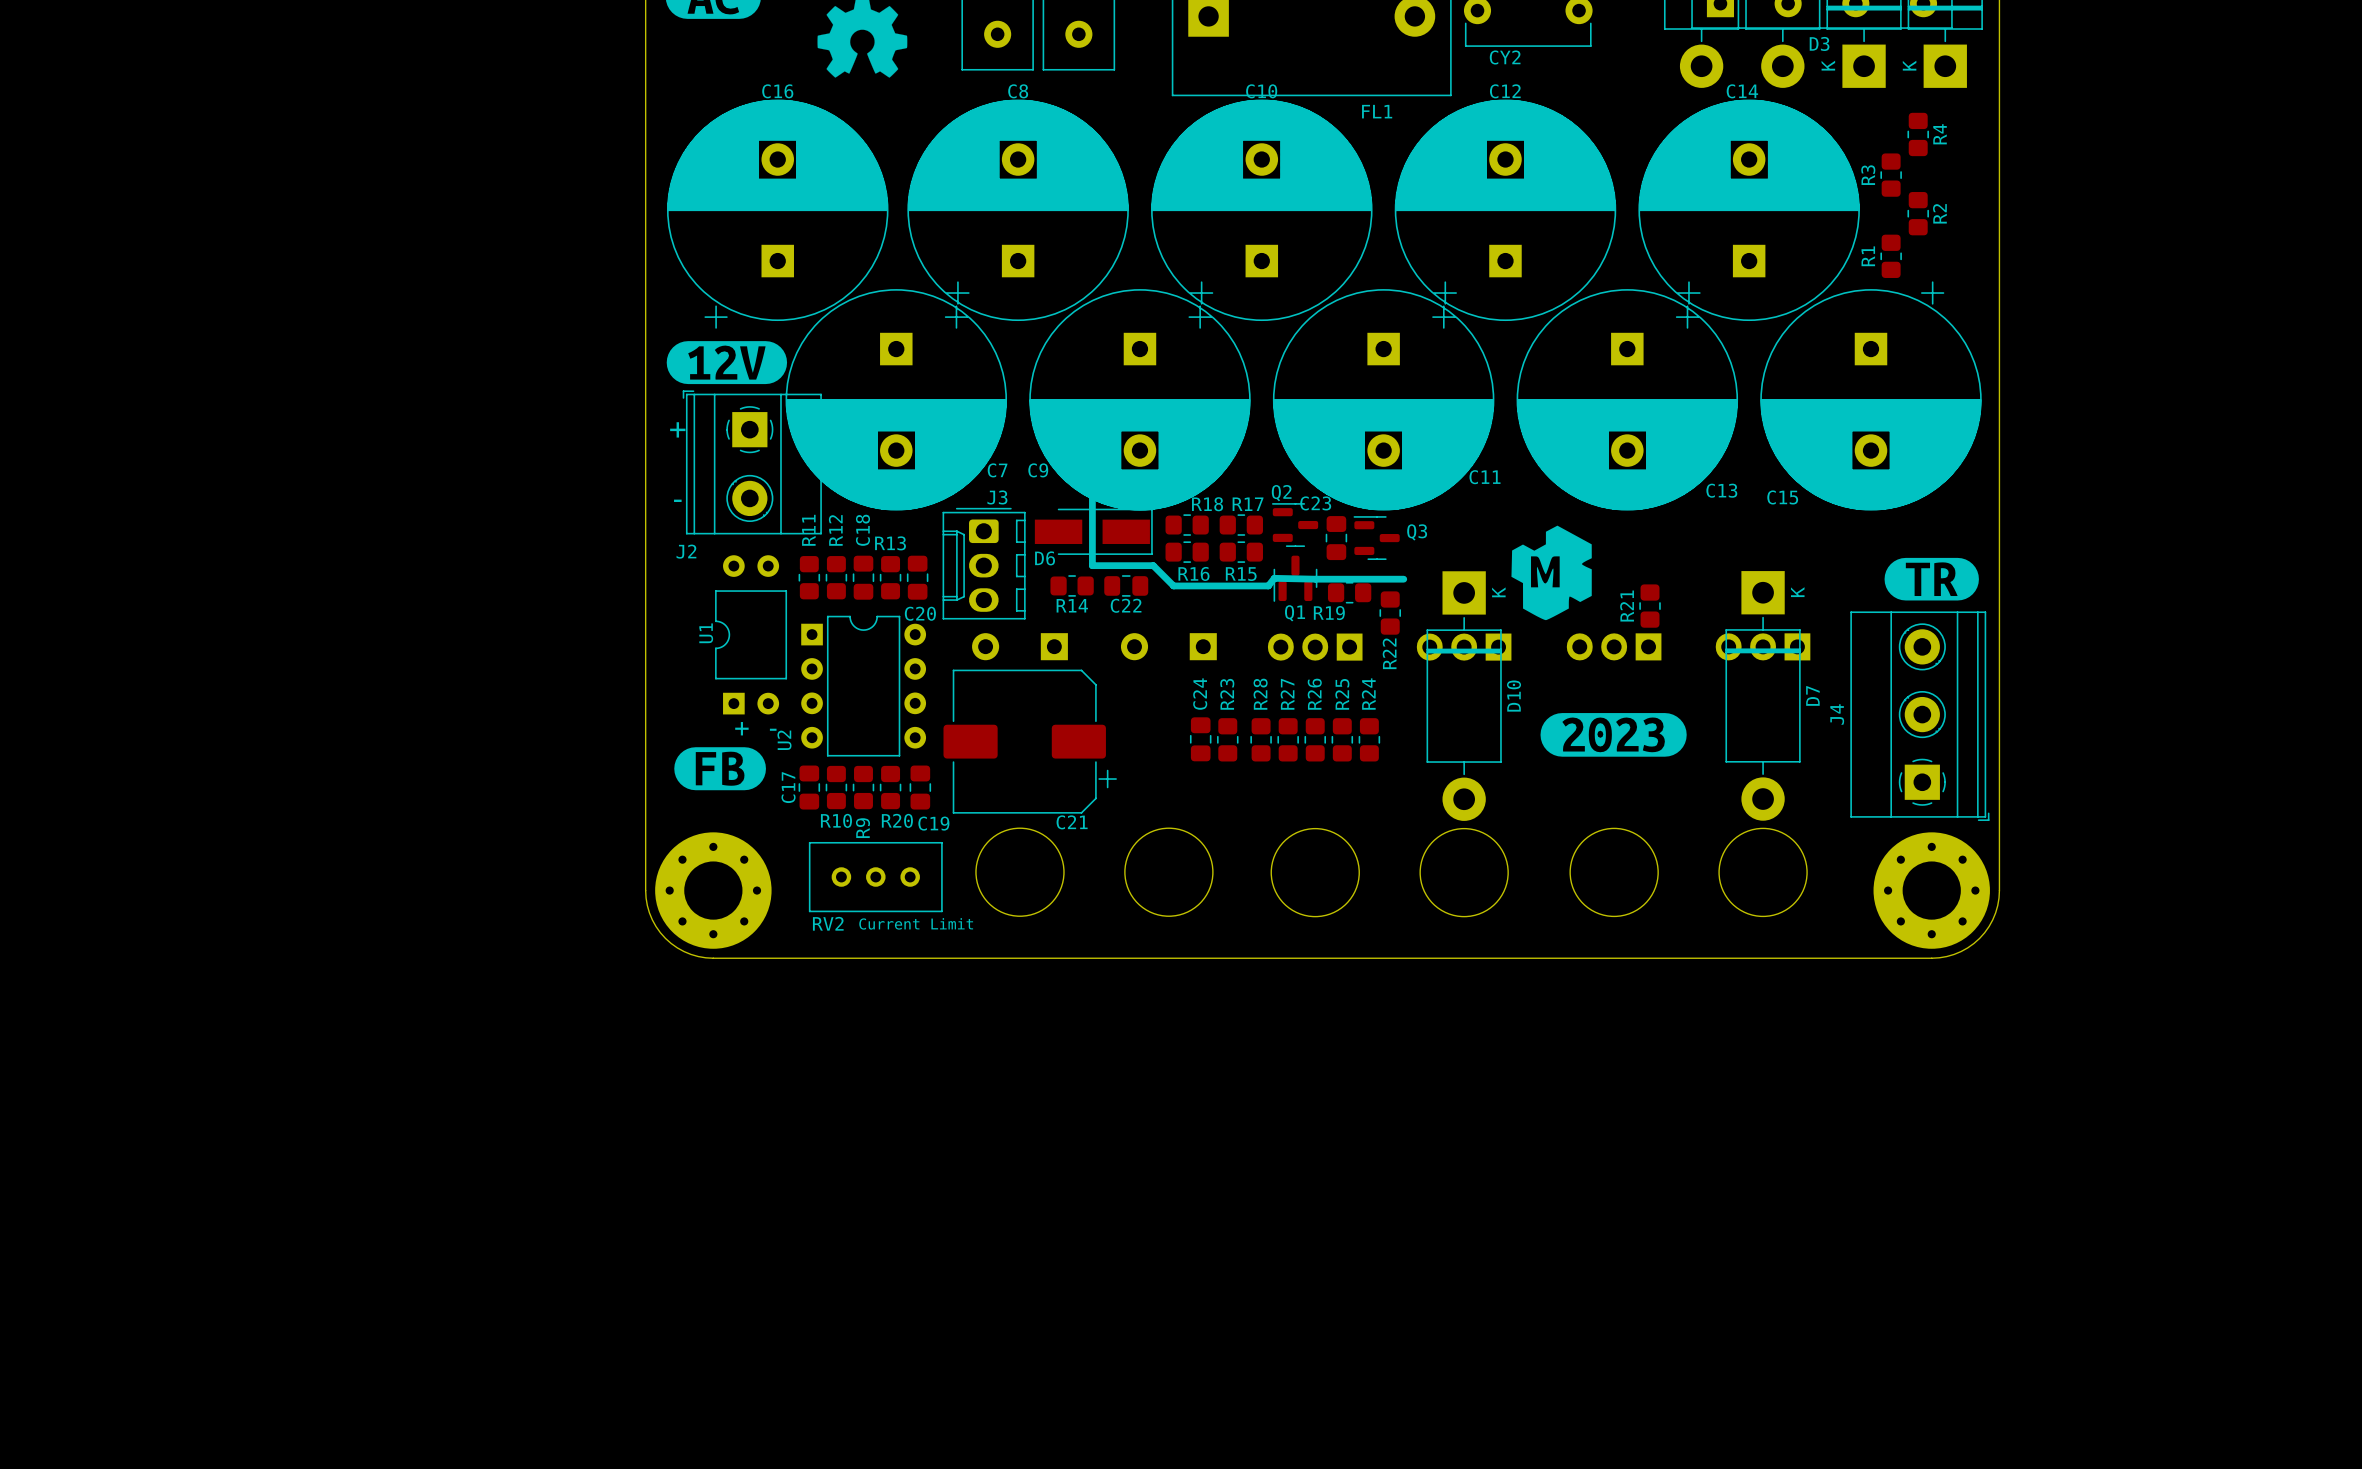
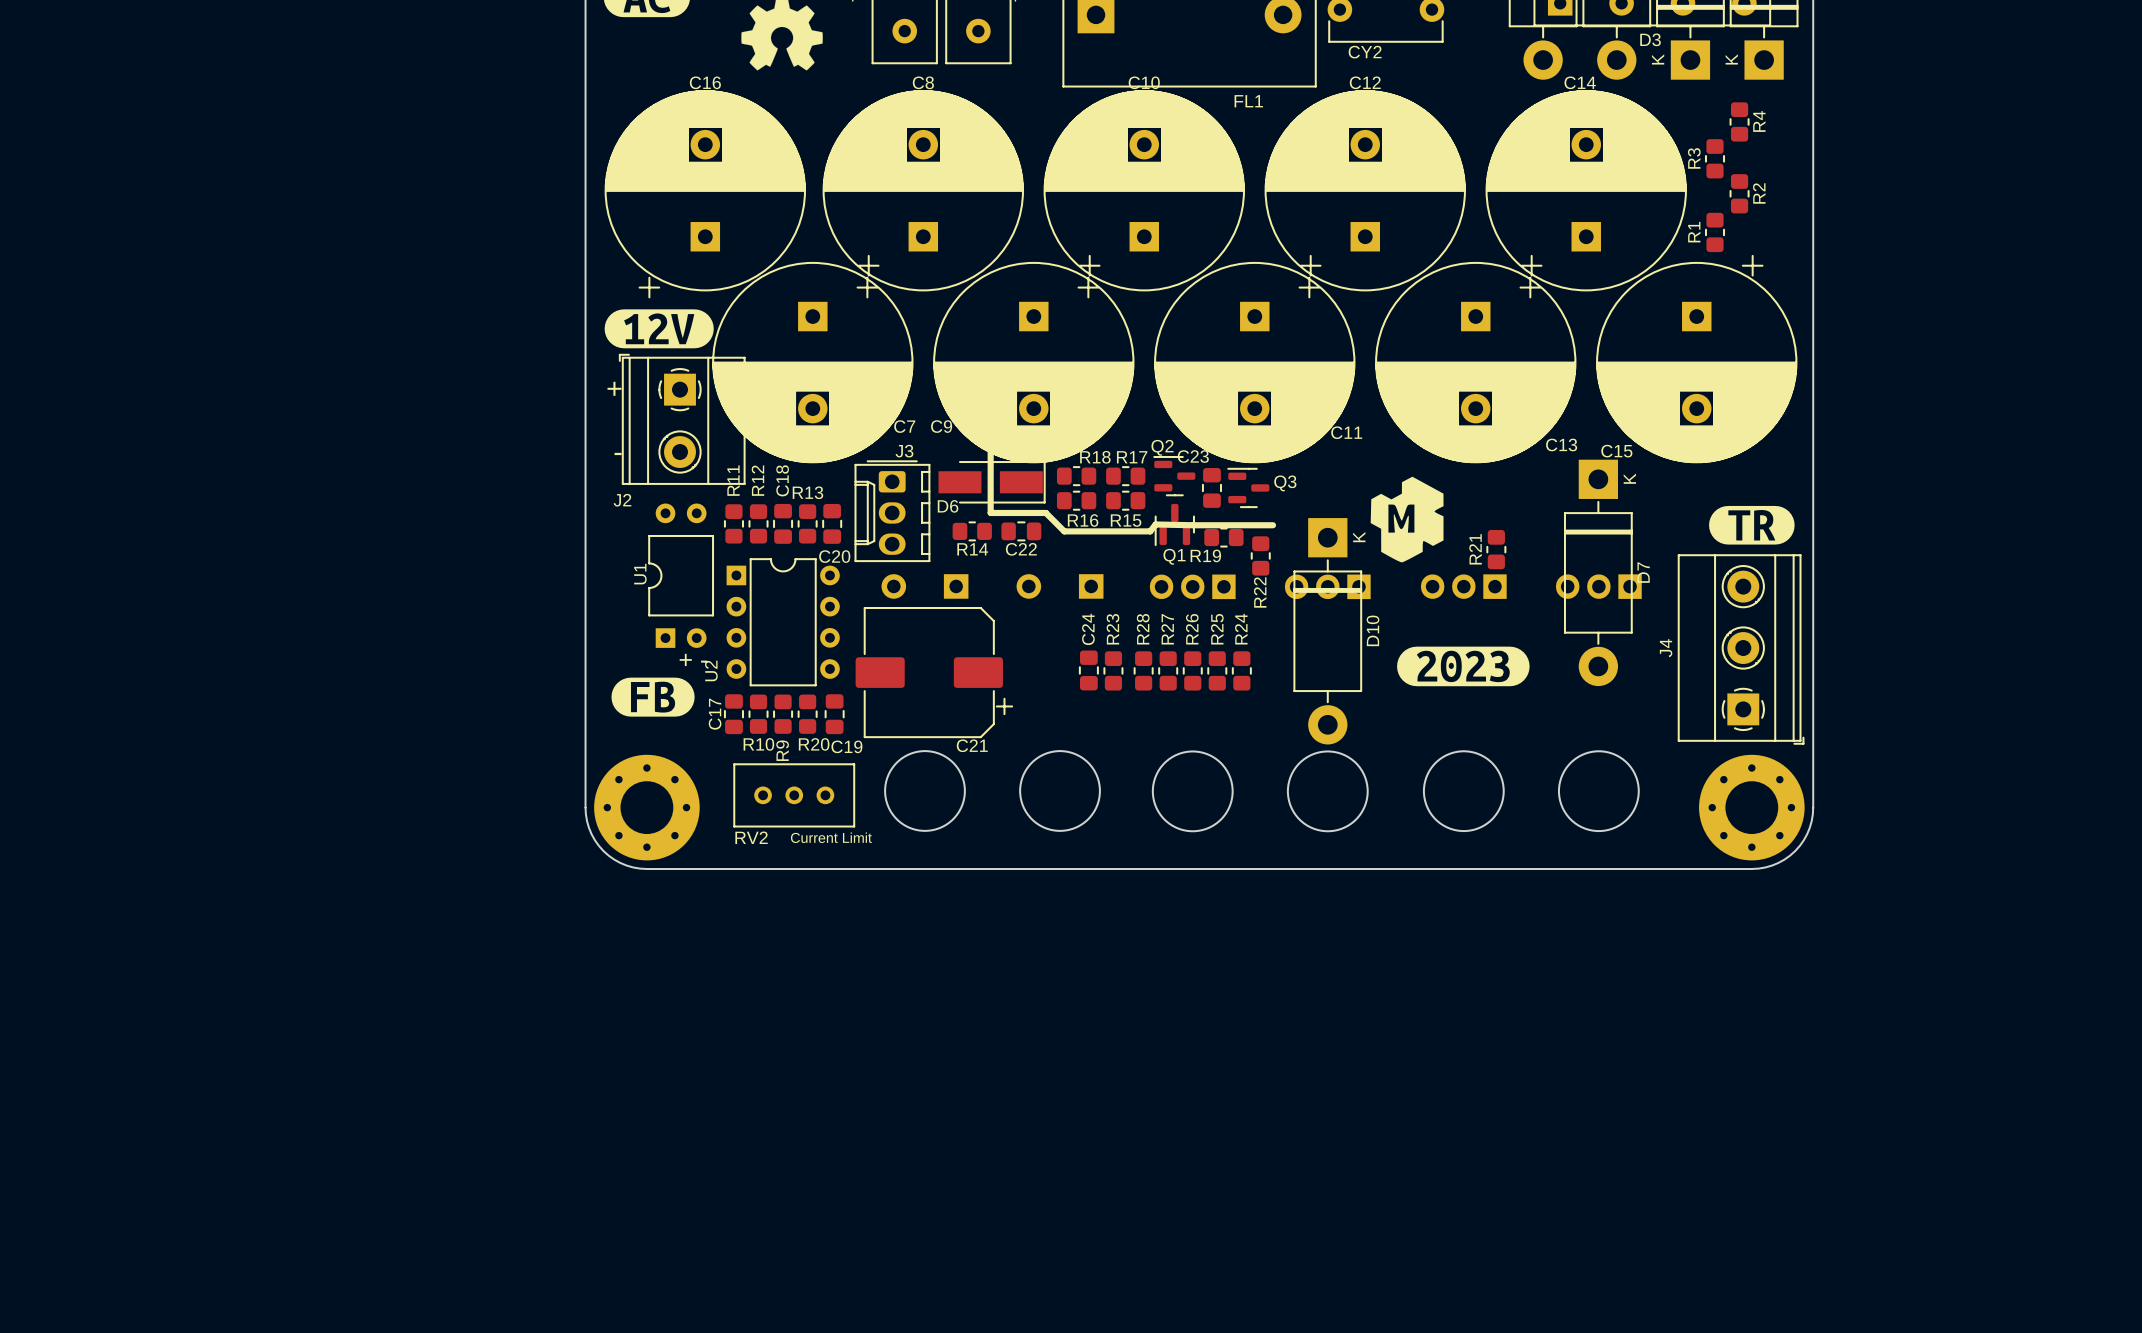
D7 position: (1763, 695) -> (1598, 572)

